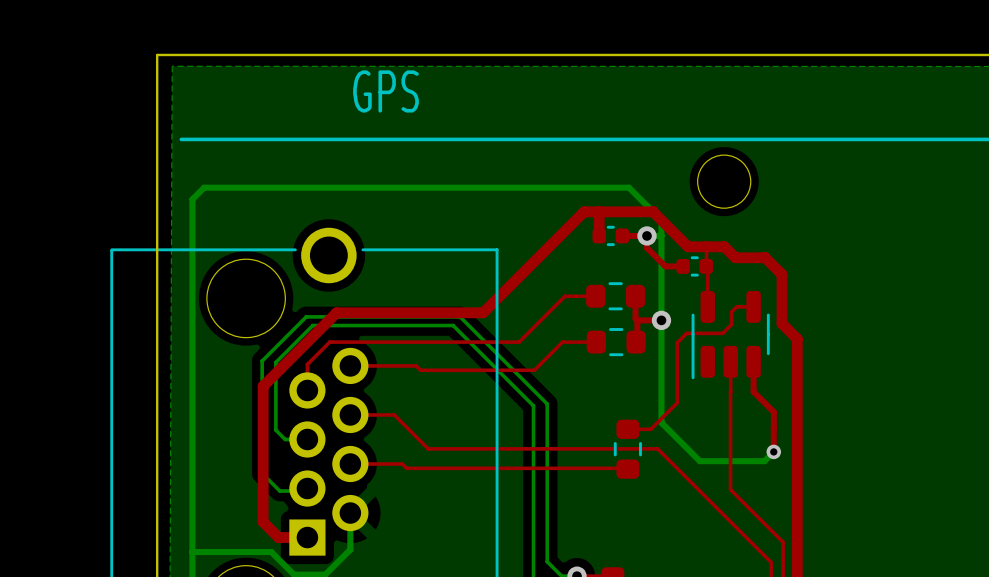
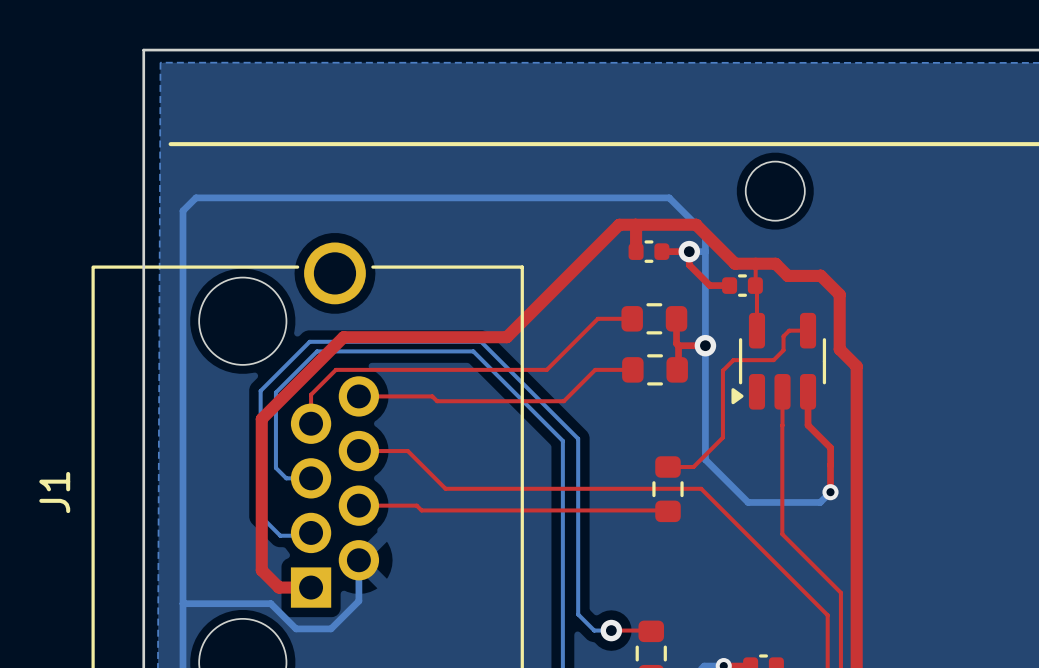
text: GPS (386, 91) -> none
part footprint: [691, 290, 770, 380] -> [731, 312, 827, 410]
J1 name: none -> J1 (54, 492)

